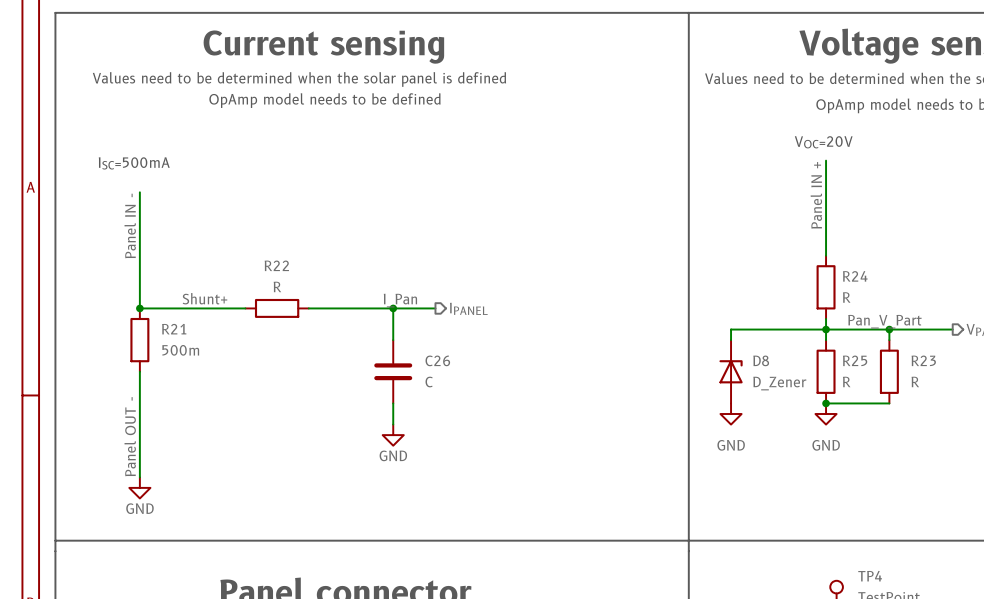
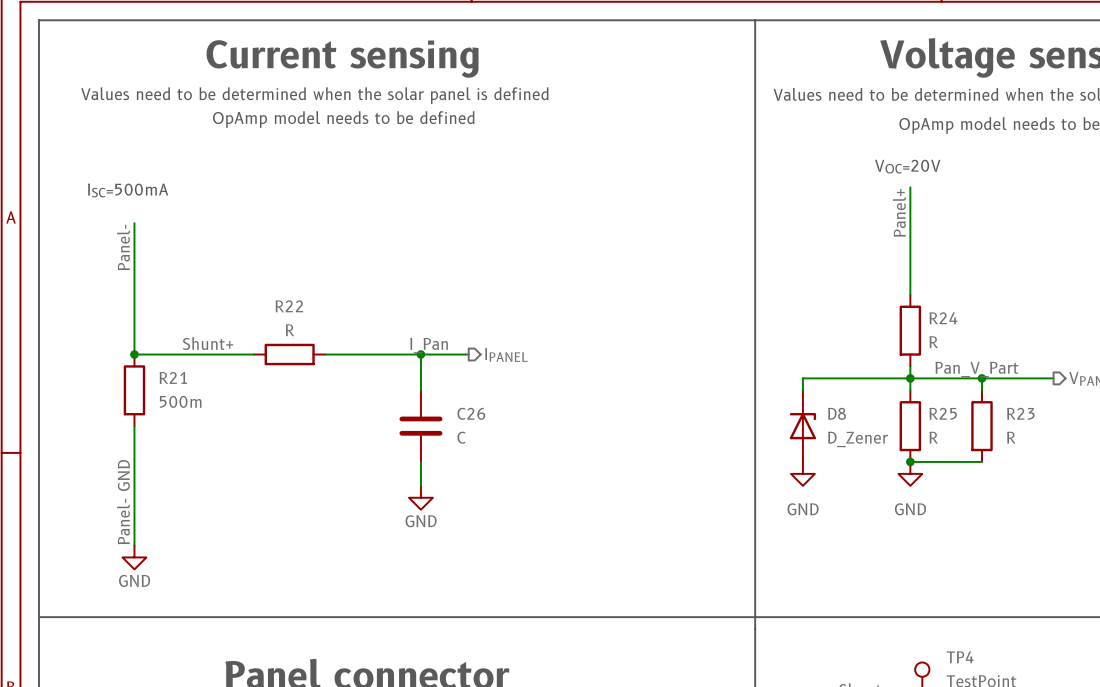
label: Panel IN + (816, 195) -> Panel+ (899, 212)
label: Panel IN - (130, 225) -> Panel- (123, 247)
label: Panel OUT - (130, 436) -> Panel- GND (123, 502)

